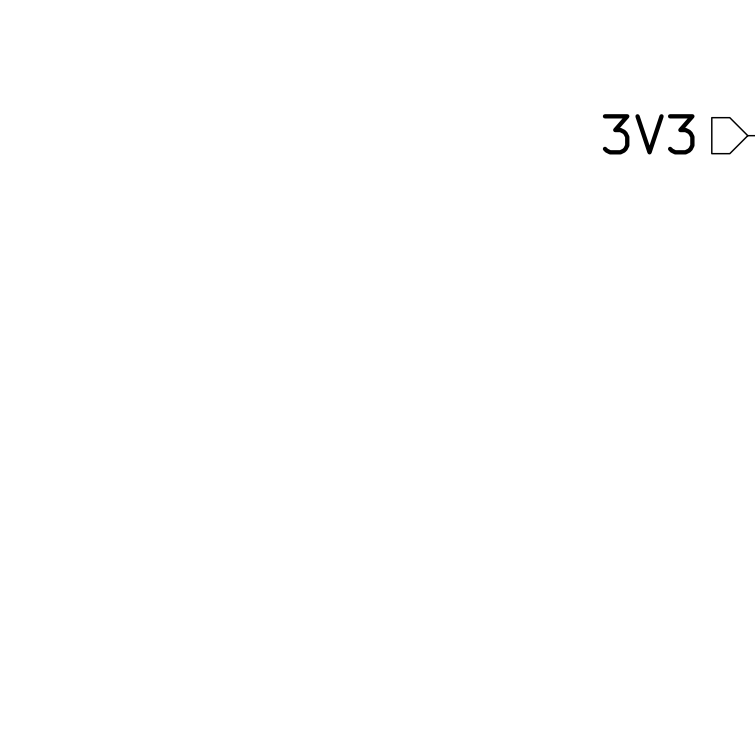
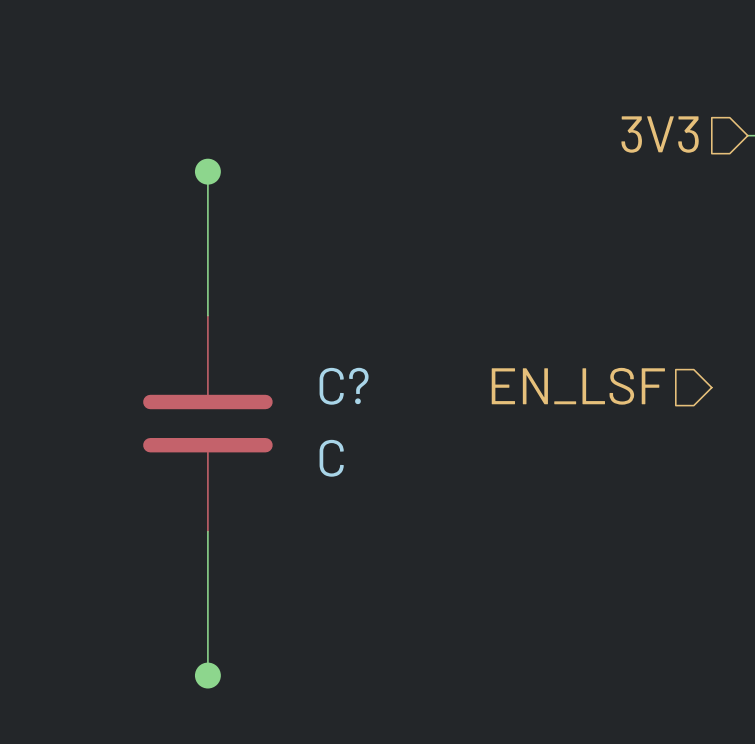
wire: none -> (207, 171) (207, 315)
junction: none -> (207, 171)
hierarchical label: none -> EN_LSF (578, 386)
C?: none -> C (207, 423)
wire: none -> (207, 531) (207, 675)
junction: none -> (207, 675)

